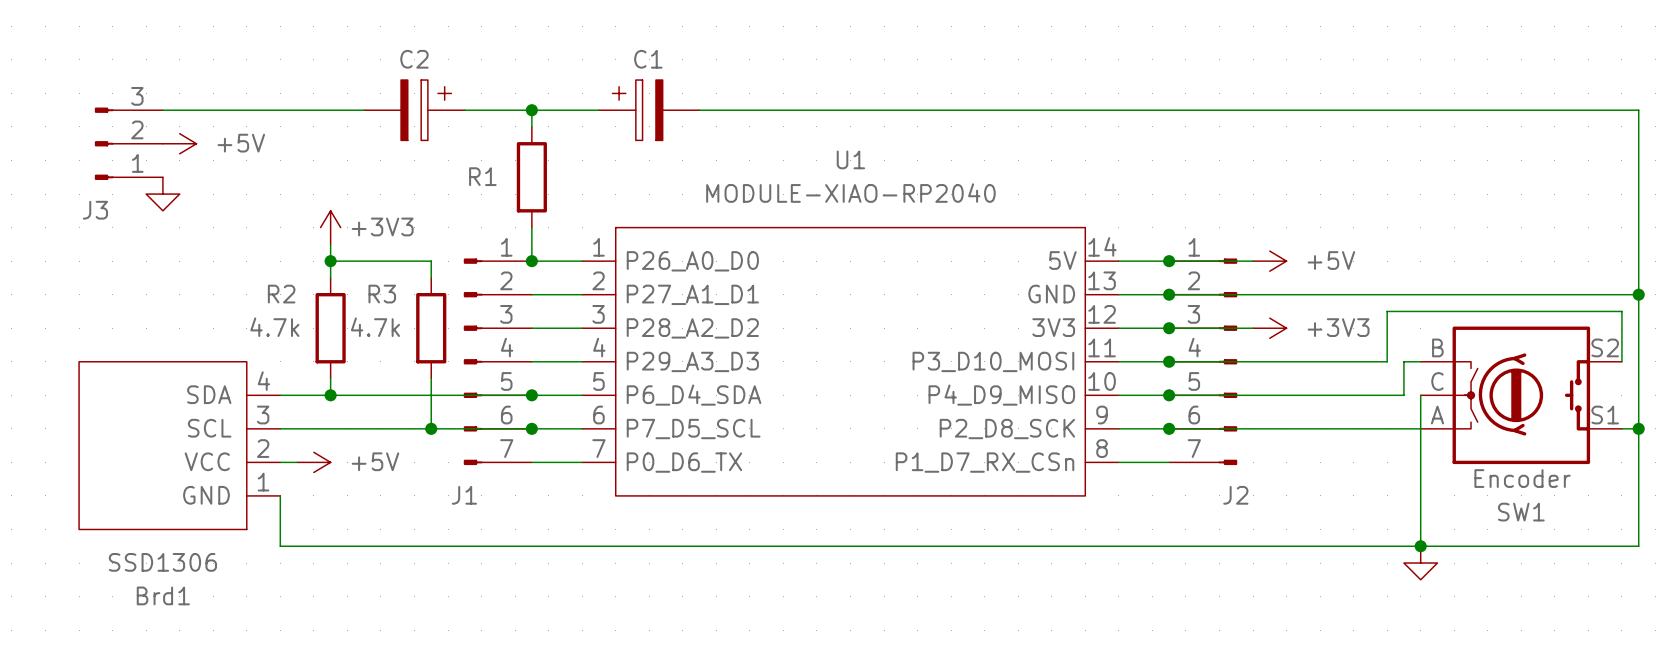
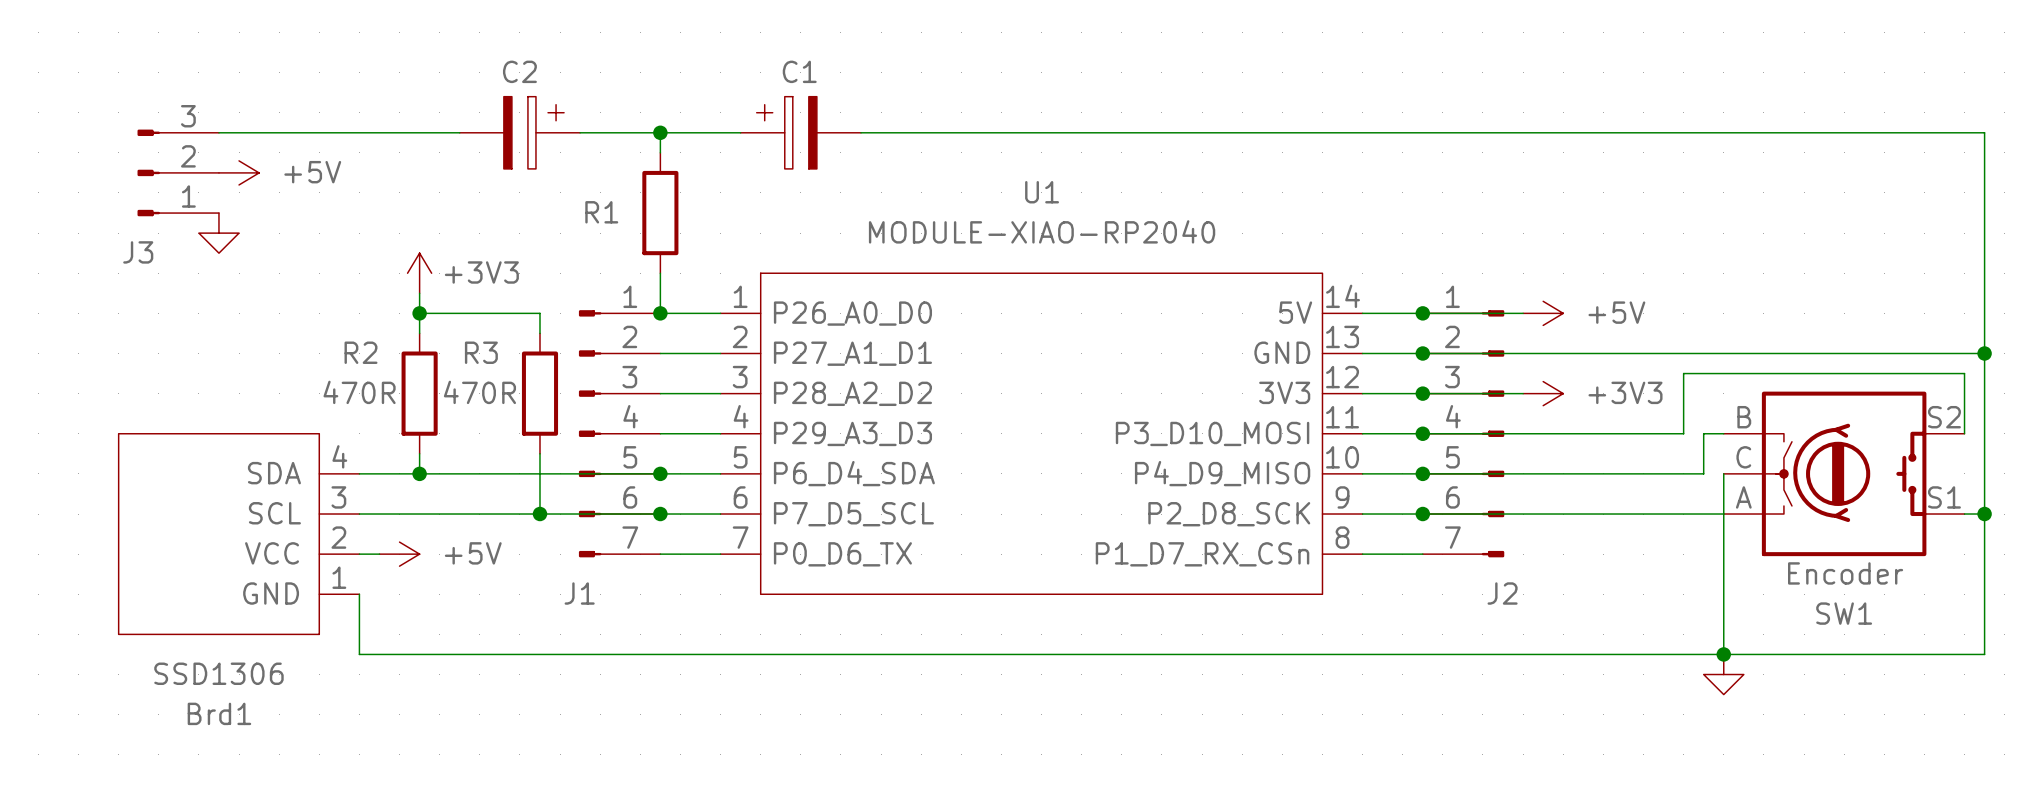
R2 value: 4.7k (274, 327) -> 470R (359, 392)
R3 value: 4.7k (375, 327) -> 470R (479, 392)

